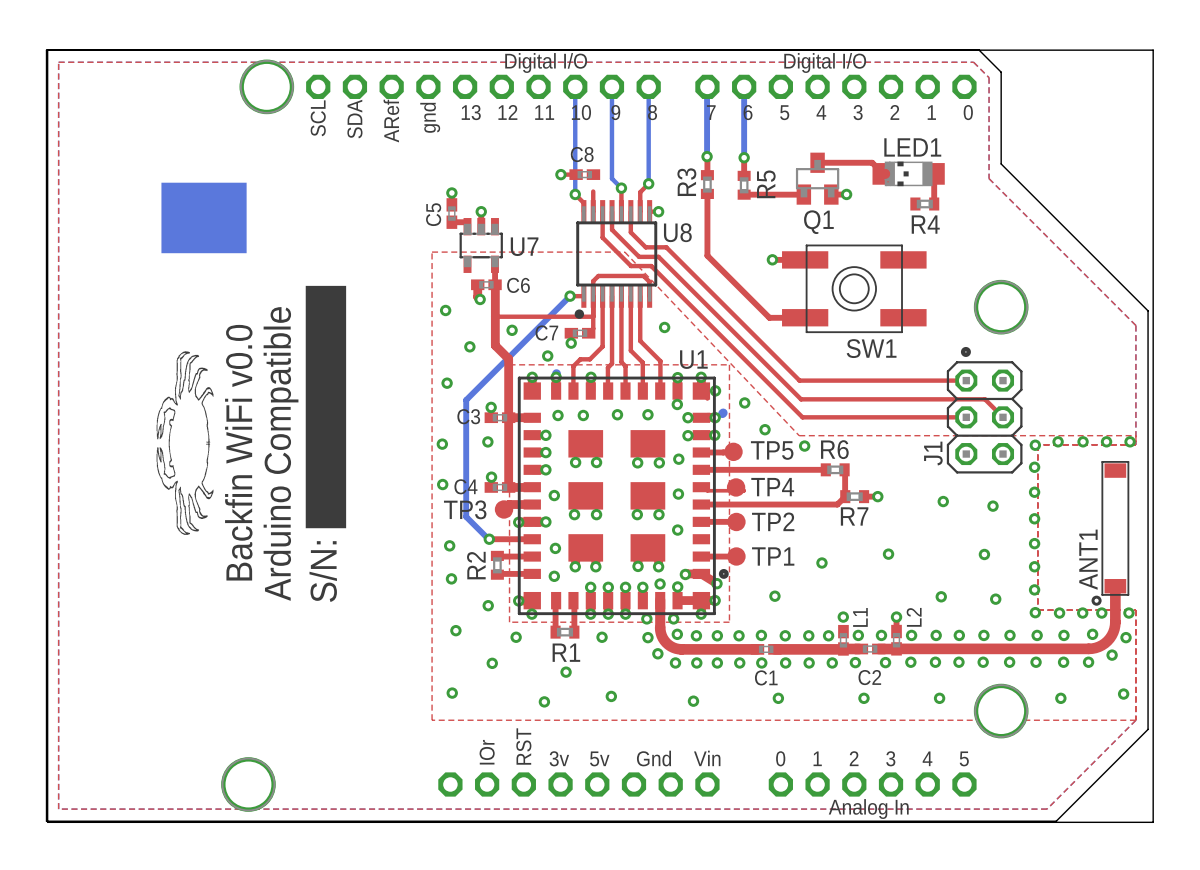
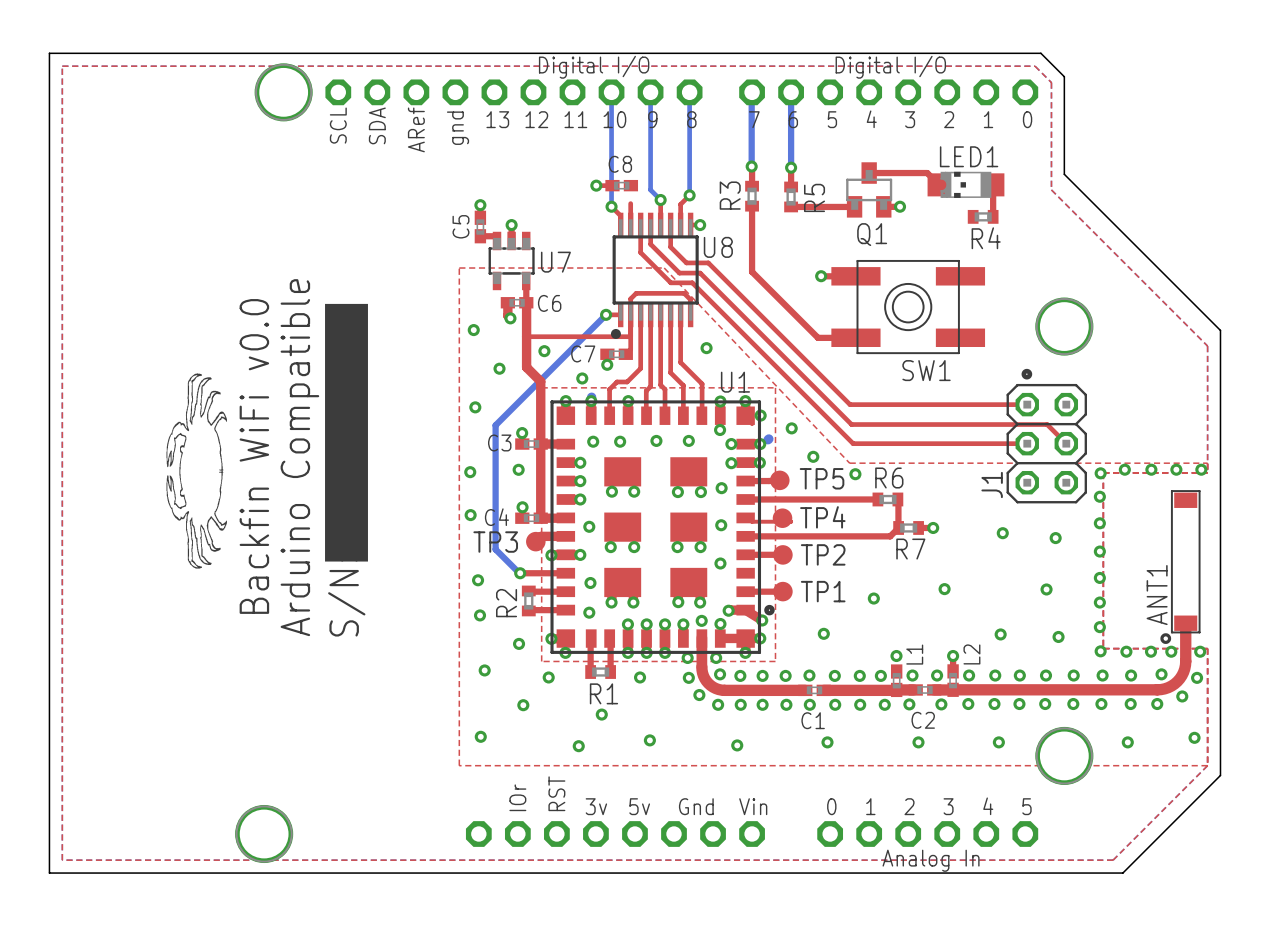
board edge: (47, 50) (1153, 50) (1153, 822) (47, 822) (47, 50) -> none
drawing: [161, 182, 247, 254] -> none

